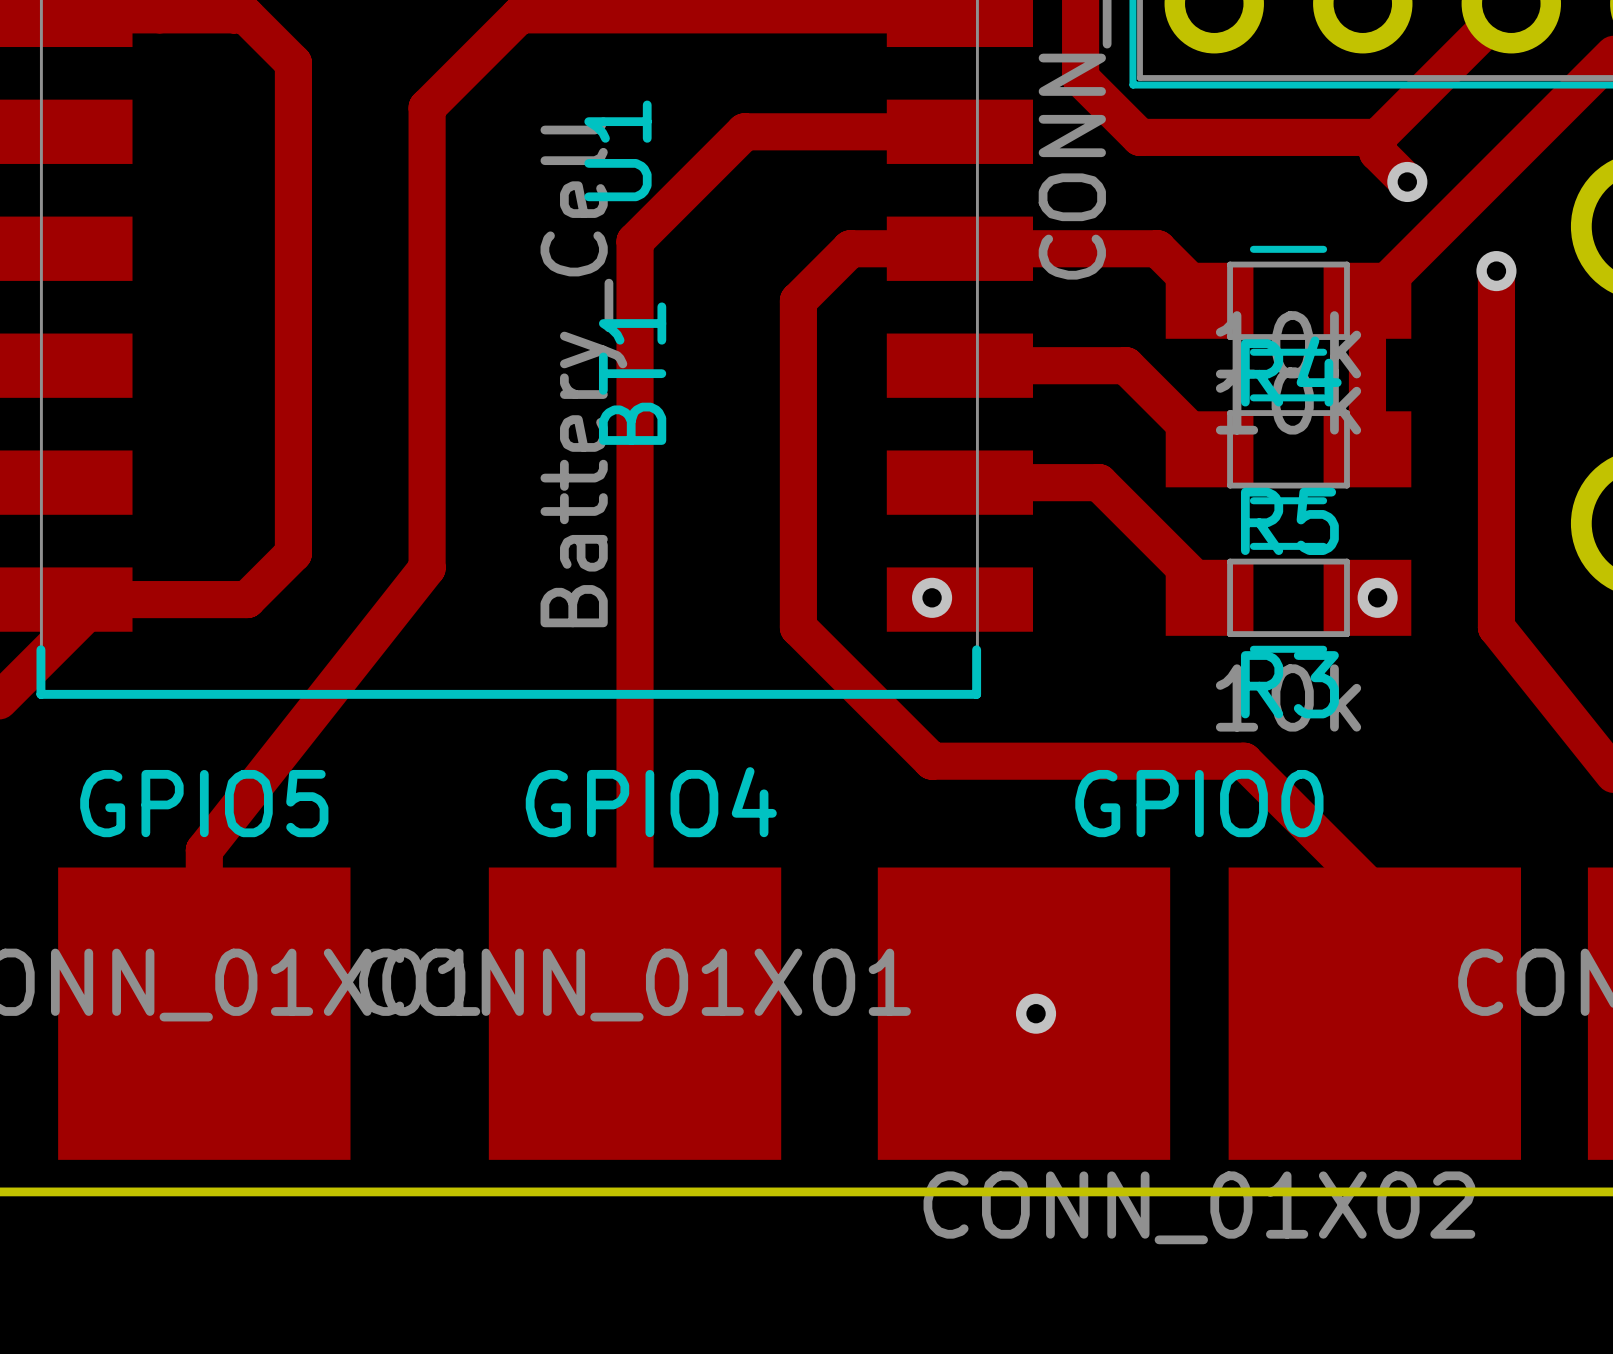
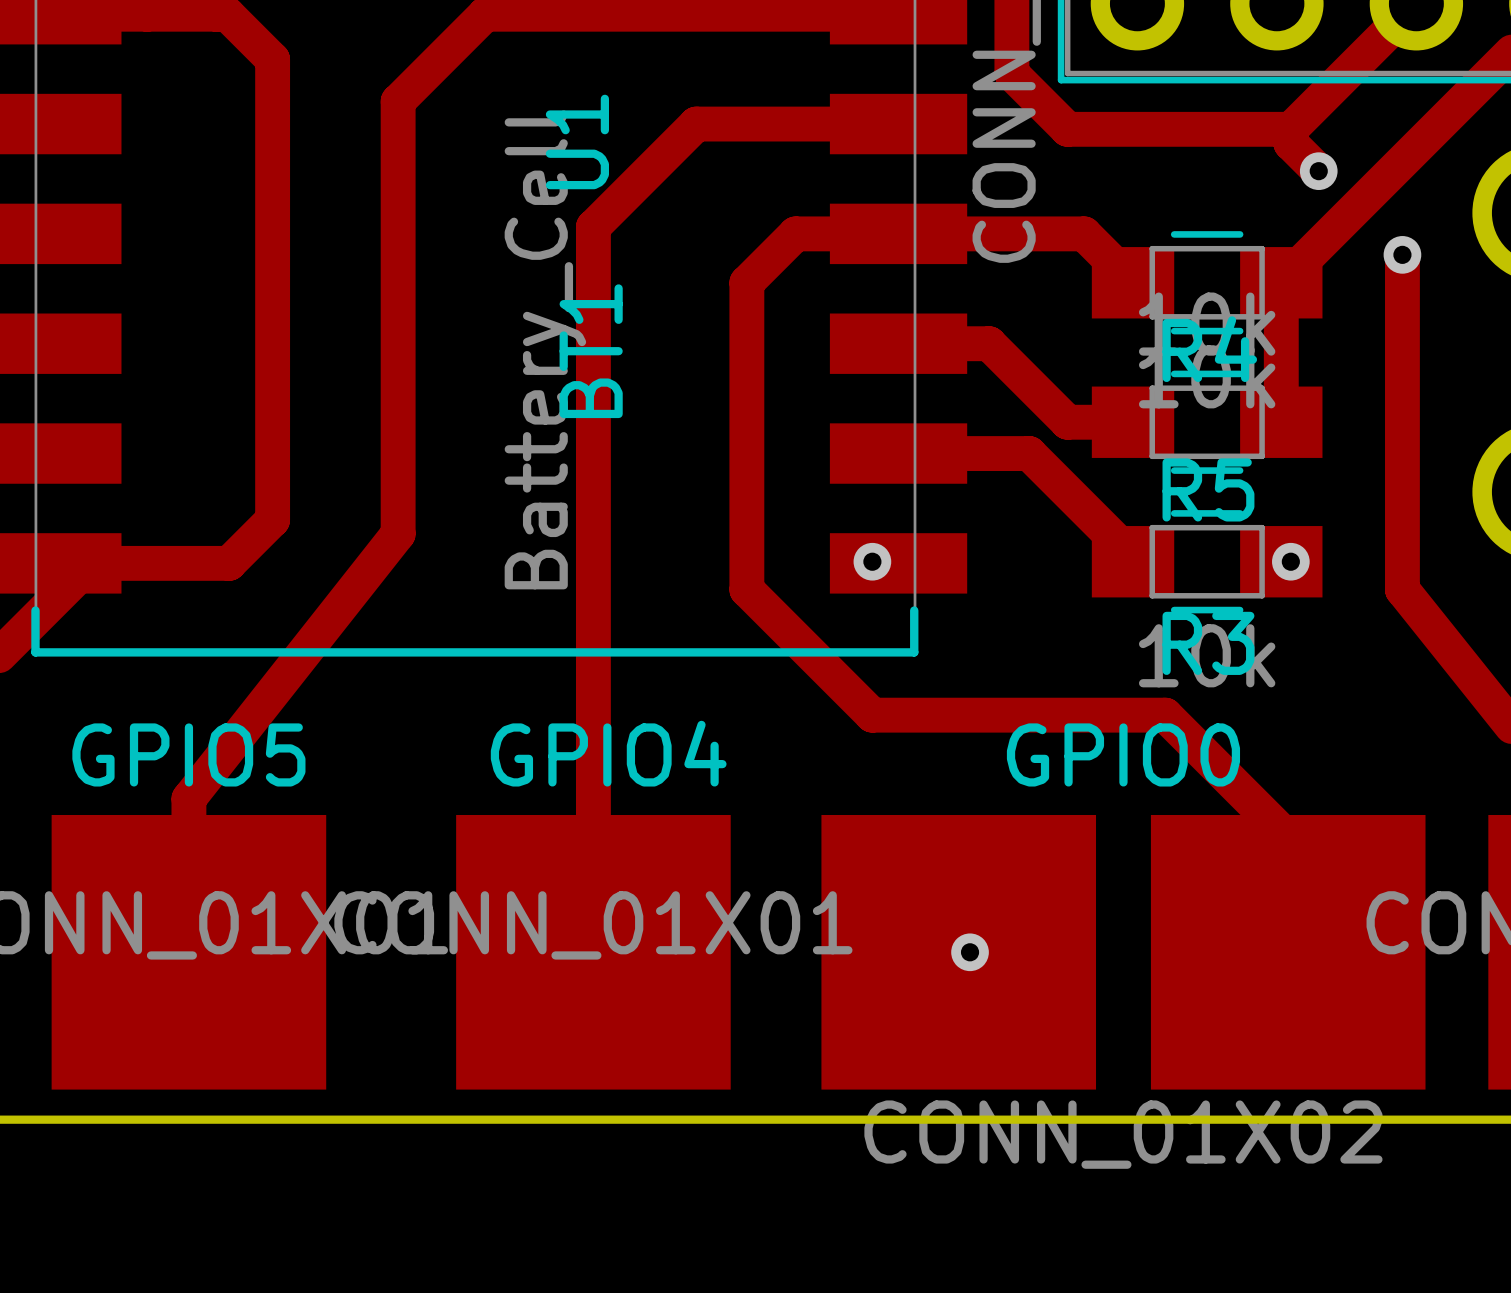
track: (1056, 365) (1125, 365) (1209, 449) -> (989, 343) (1067, 422) (1133, 422)

